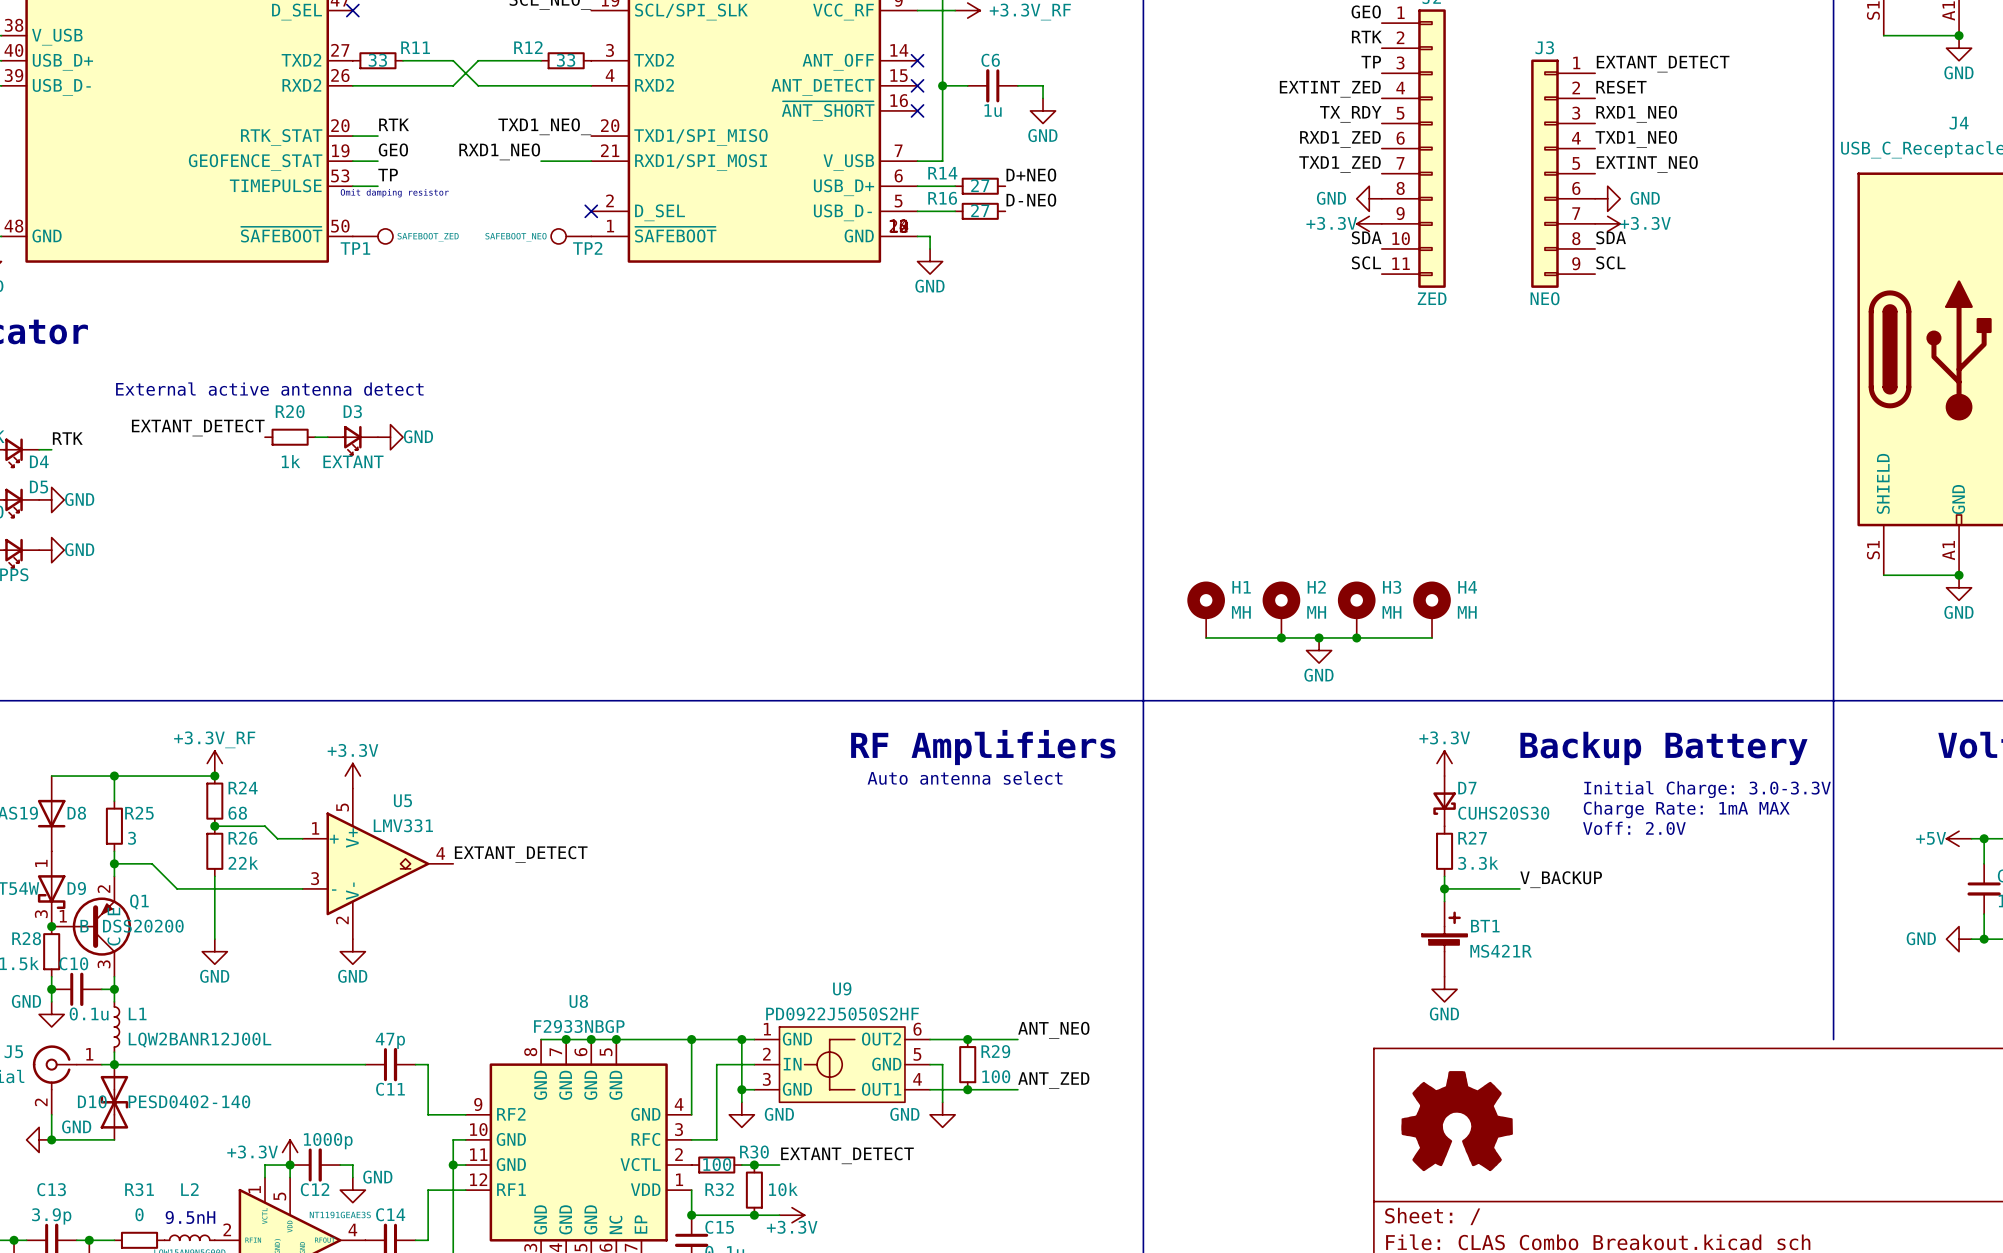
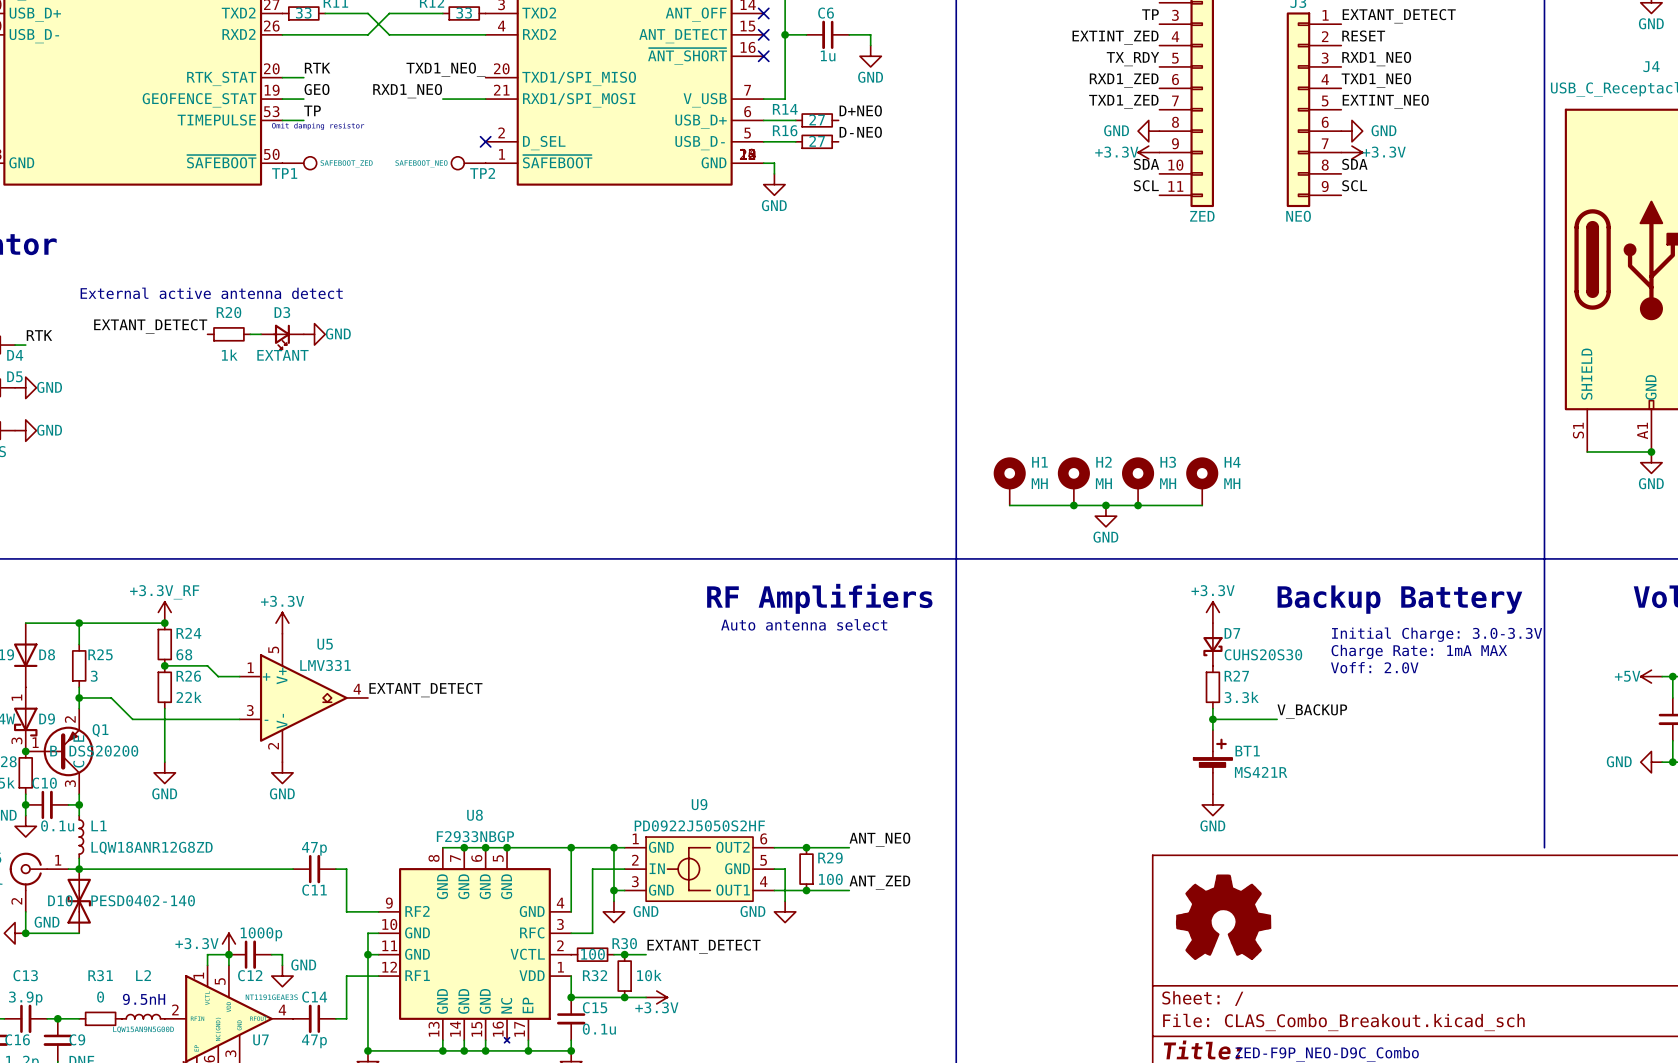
L1 value: LQW2BANR12J00L (200, 1040) -> LQW18ANR12G8ZD (152, 848)

